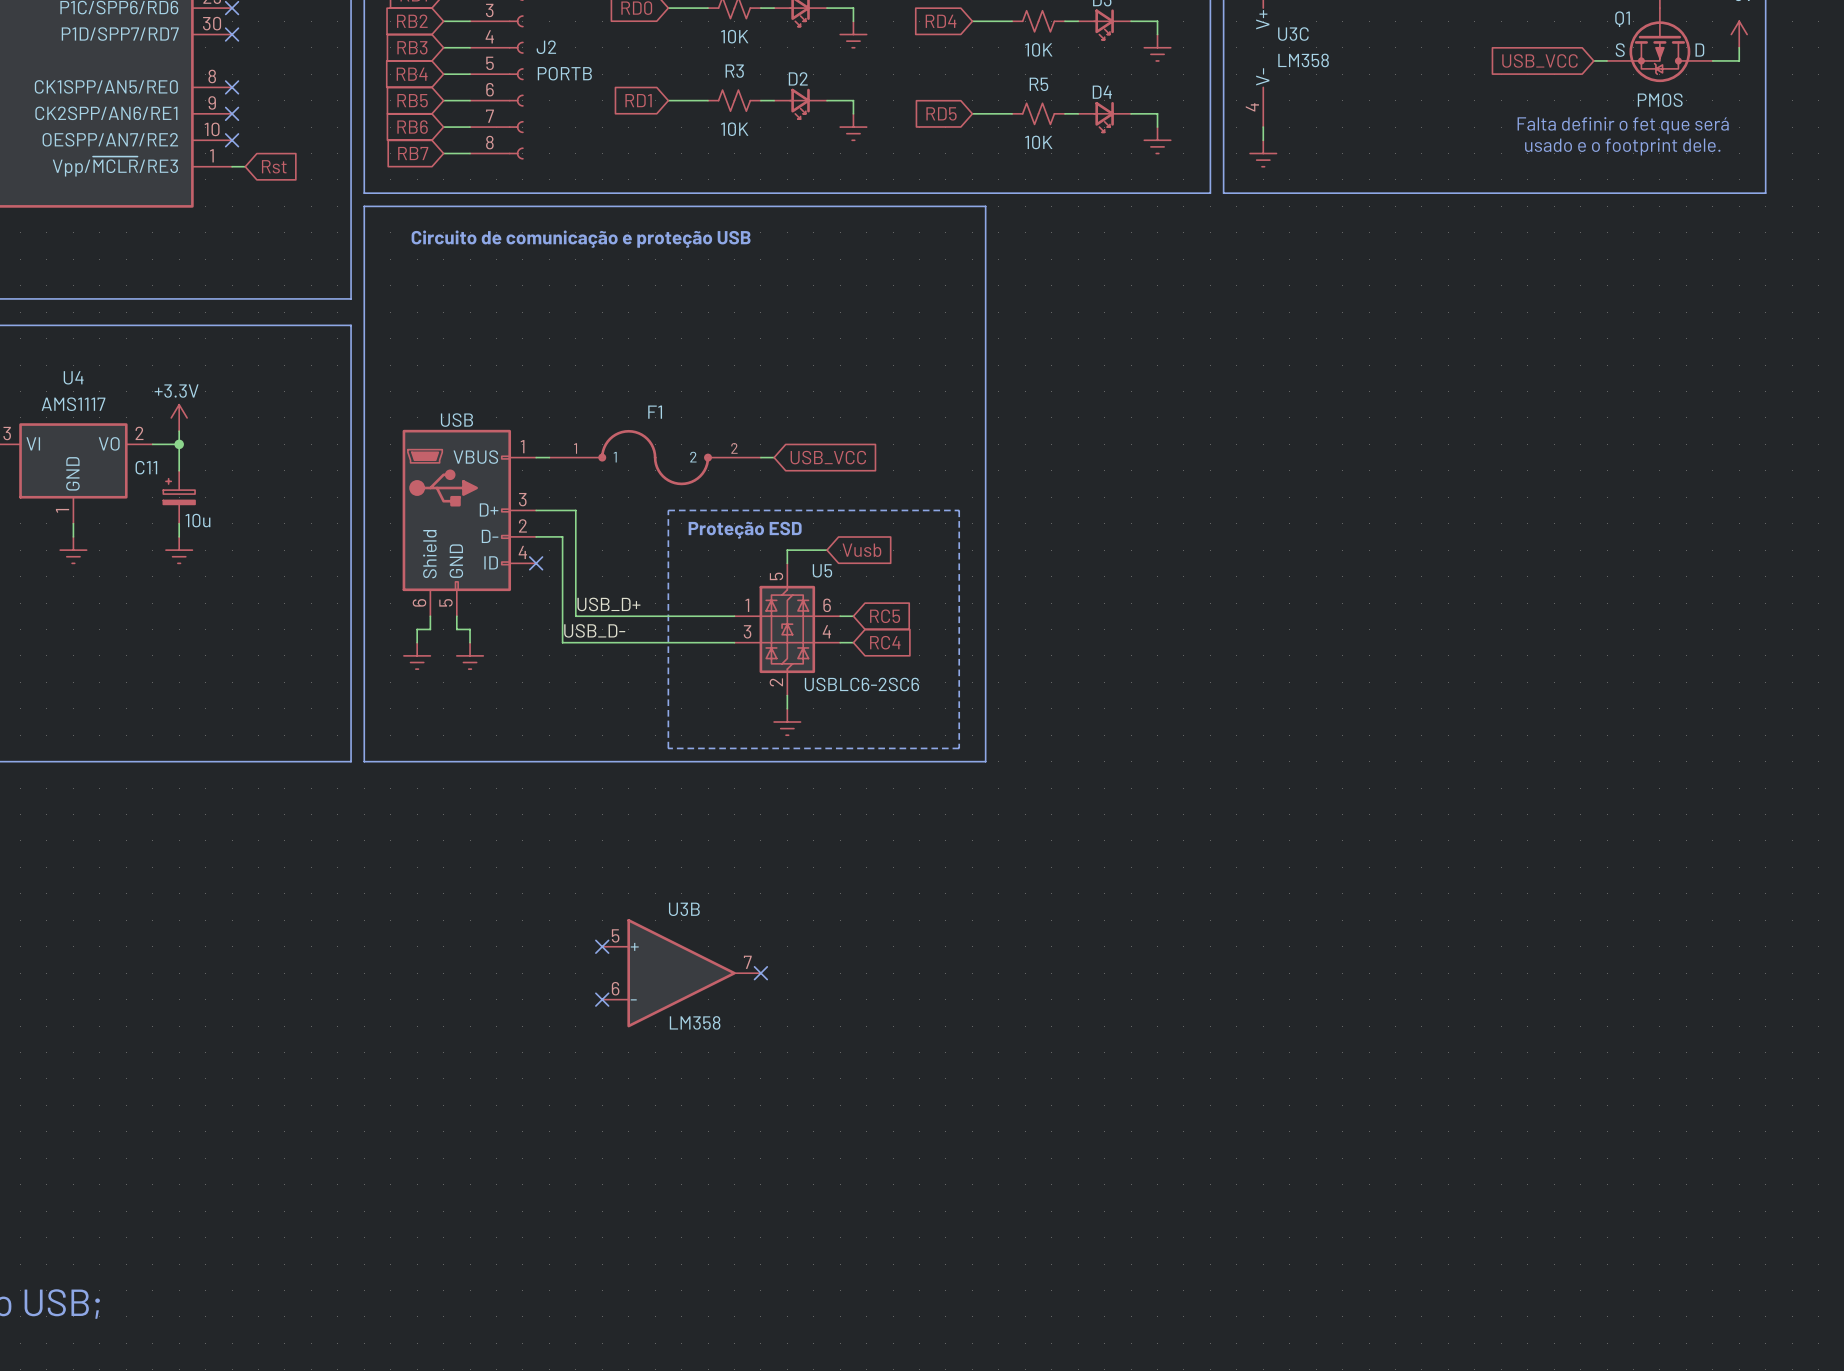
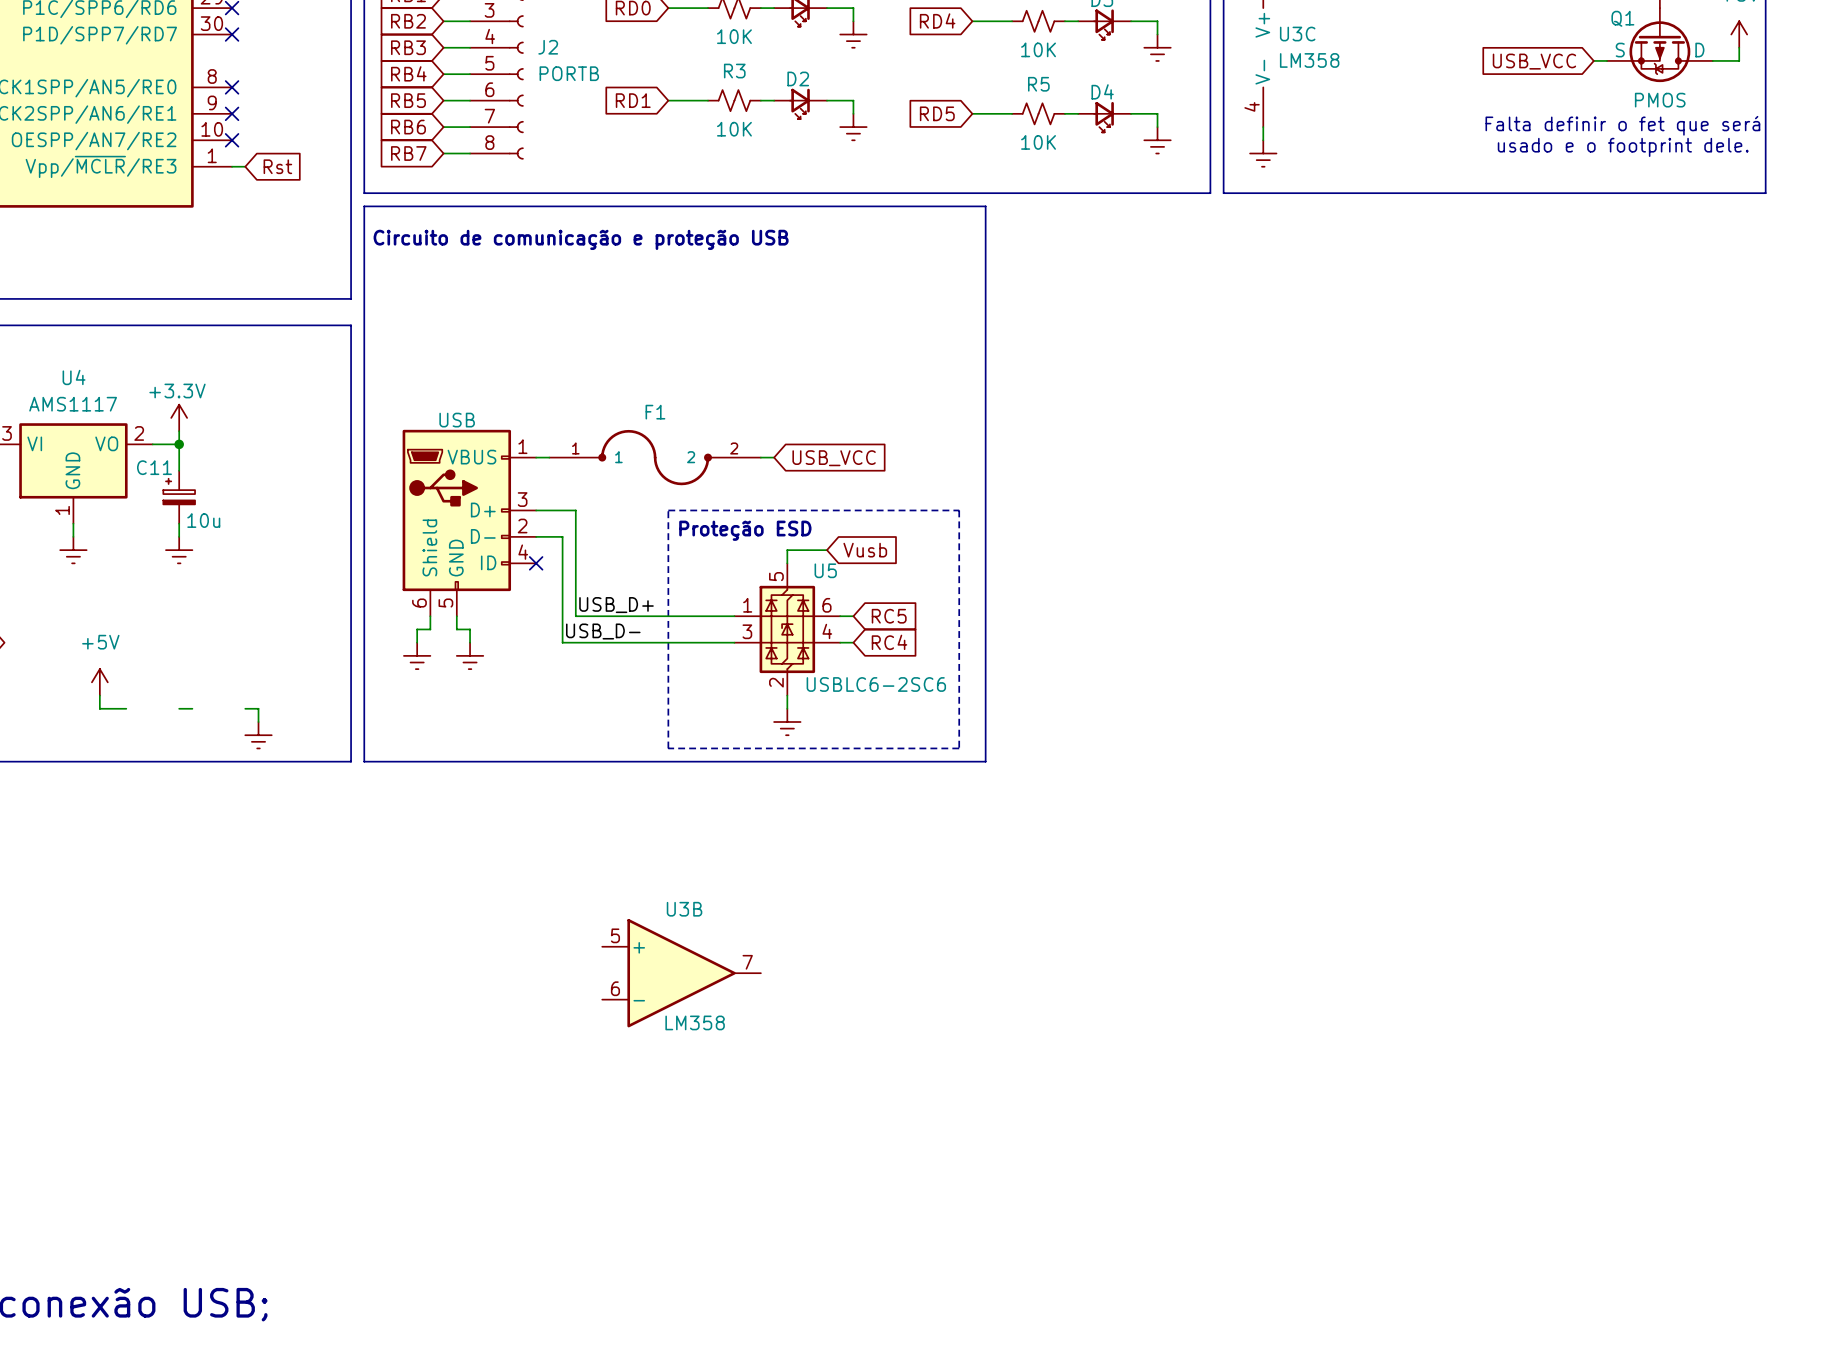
power symbol: none -> +5V (99, 682)
wire: none -> (99, 695) (99, 708) (126, 708)
wire: none -> (179, 708) (192, 708)
wire: none -> (245, 708) (258, 708) (258, 722)
power symbol: none -> (258, 735)
no-connect mark: (602, 946) -> none
no-connect mark: (760, 973) -> none
no-connect mark: (602, 999) -> none

